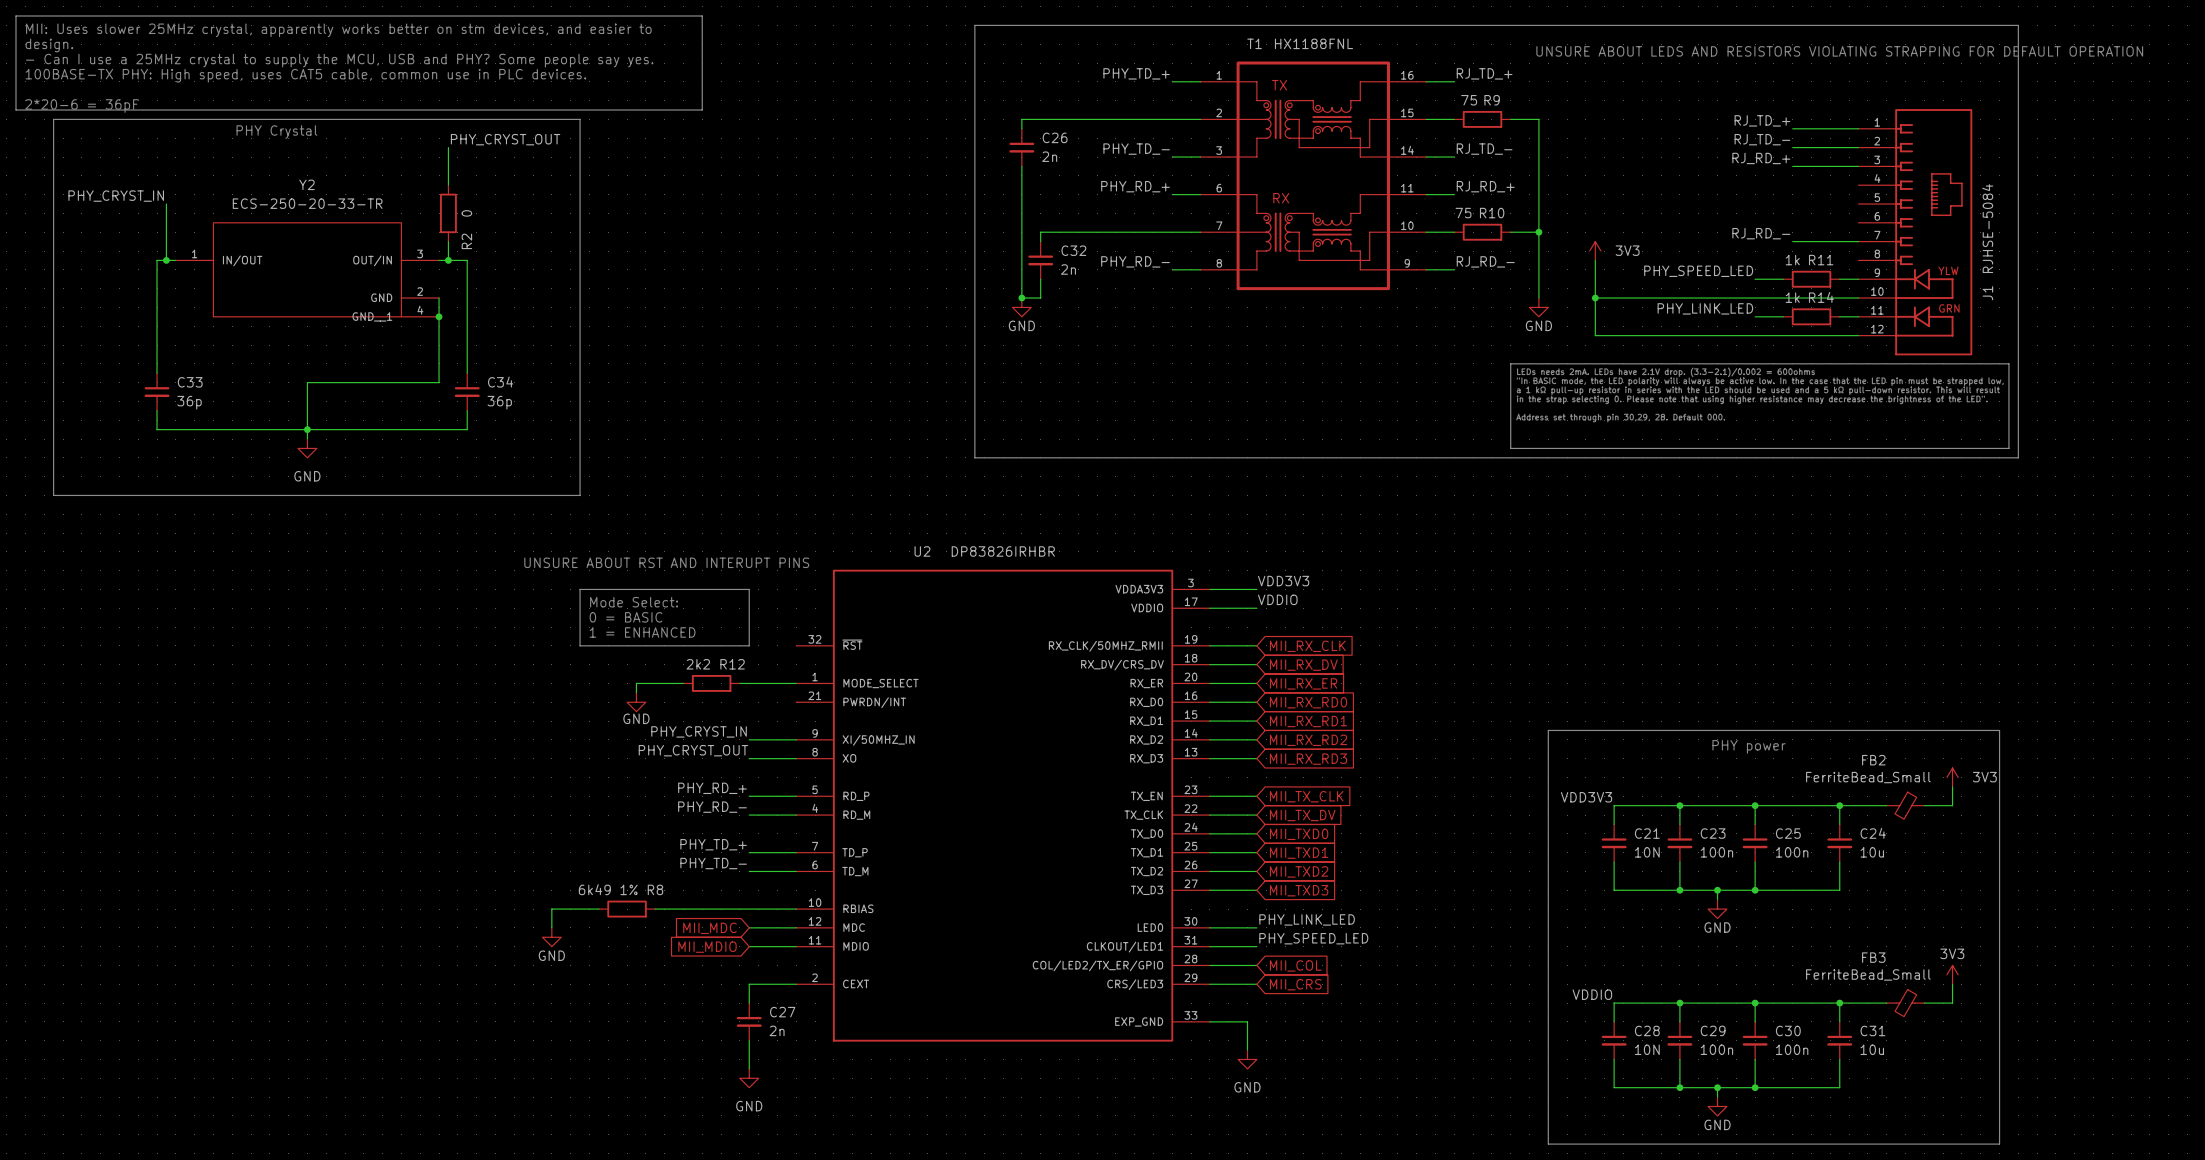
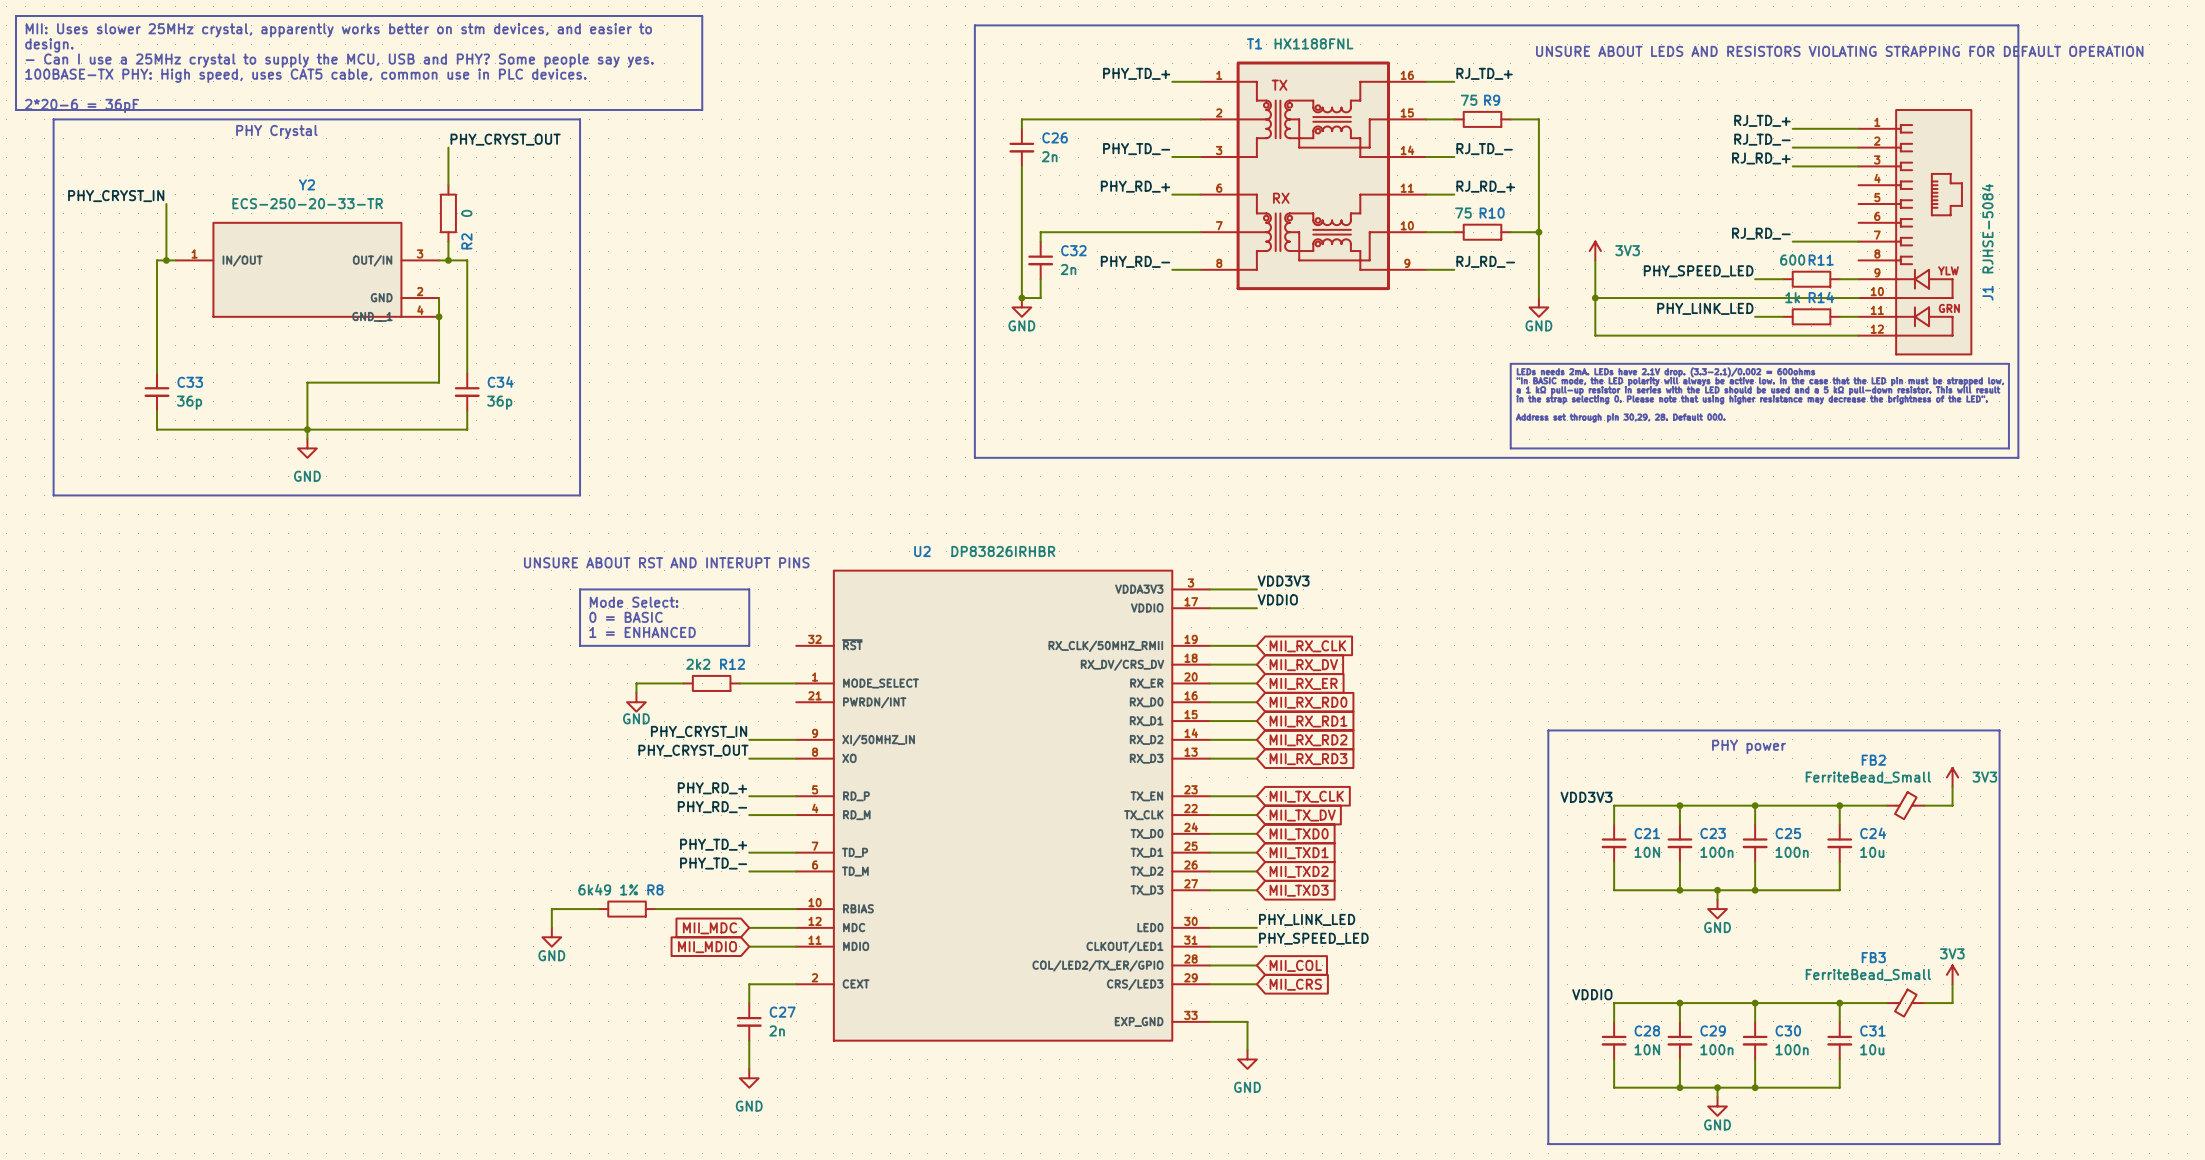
R11 value: 1k (1792, 260) -> 600 (1792, 260)

